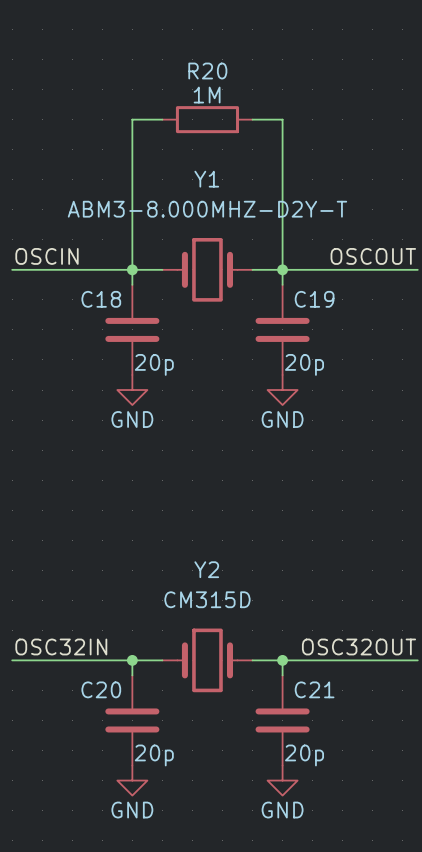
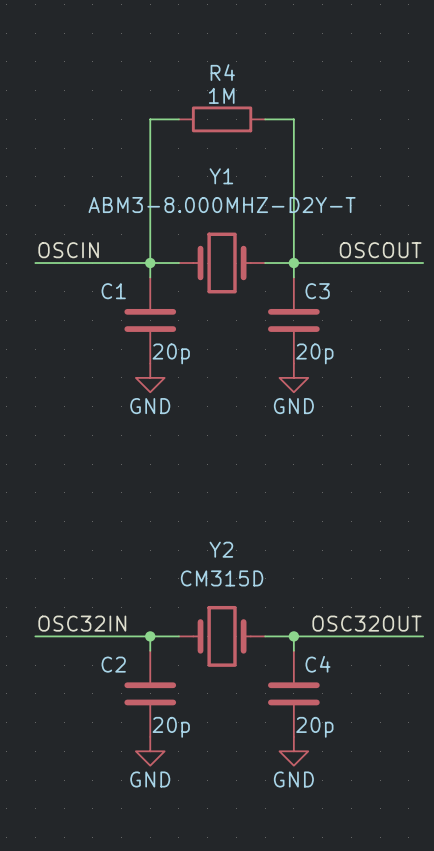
R20 name: R20 (207, 71) -> R4 (222, 72)
C18 name: C18 (101, 299) -> C1 (113, 291)
C19 name: C19 (314, 299) -> C3 (317, 291)
C20 name: C20 (101, 689) -> C2 (113, 664)
C21 name: C21 (314, 689) -> C4 (317, 664)

